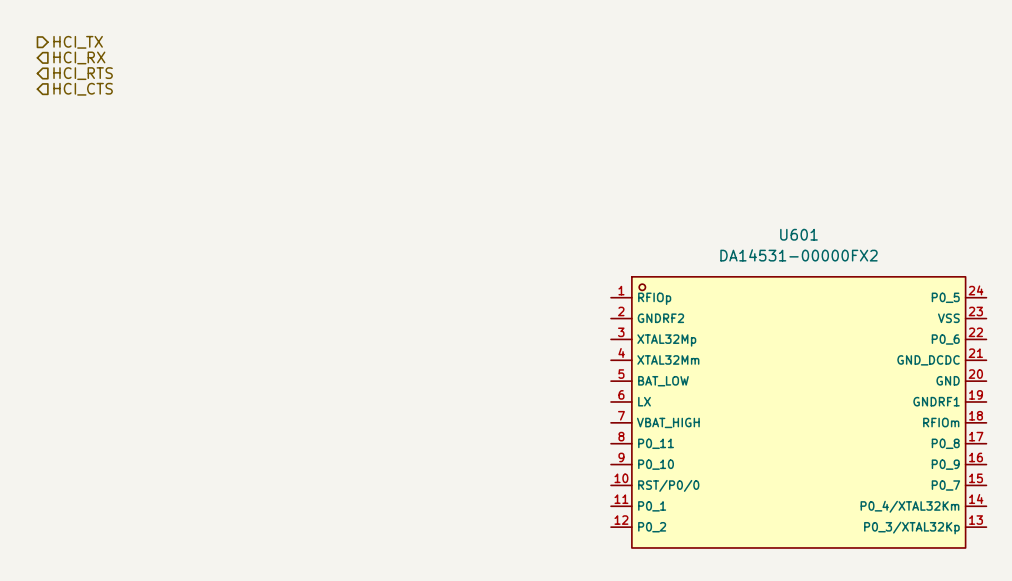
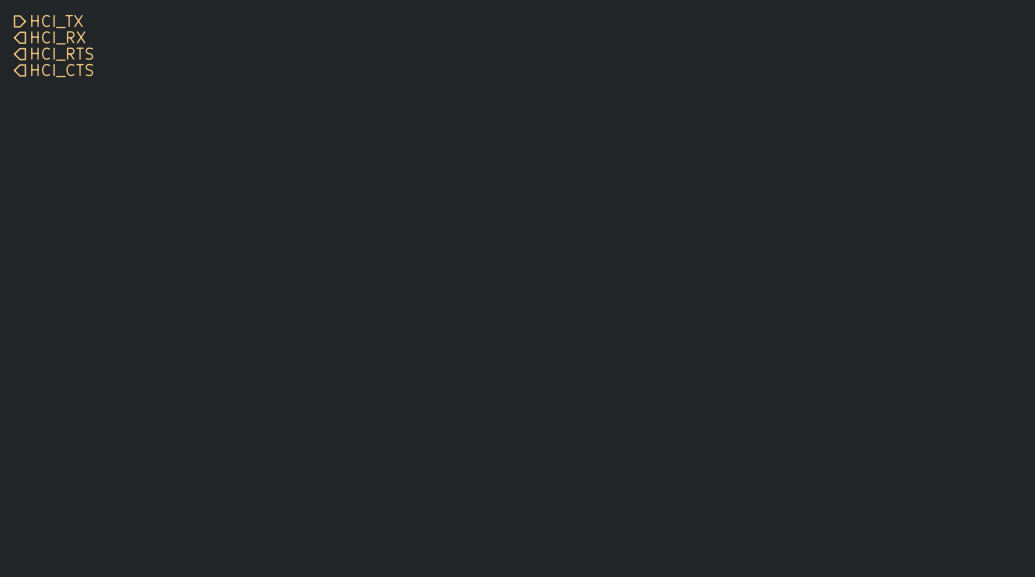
U601: DA14531-00000FX2 (798, 412) -> none

